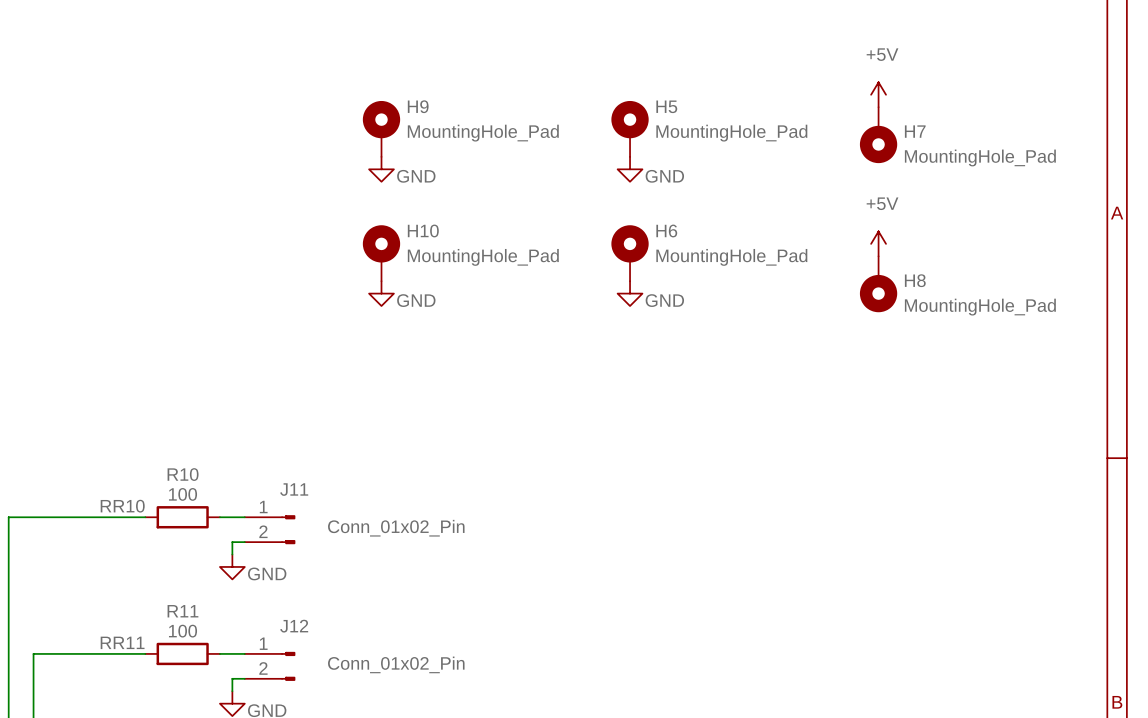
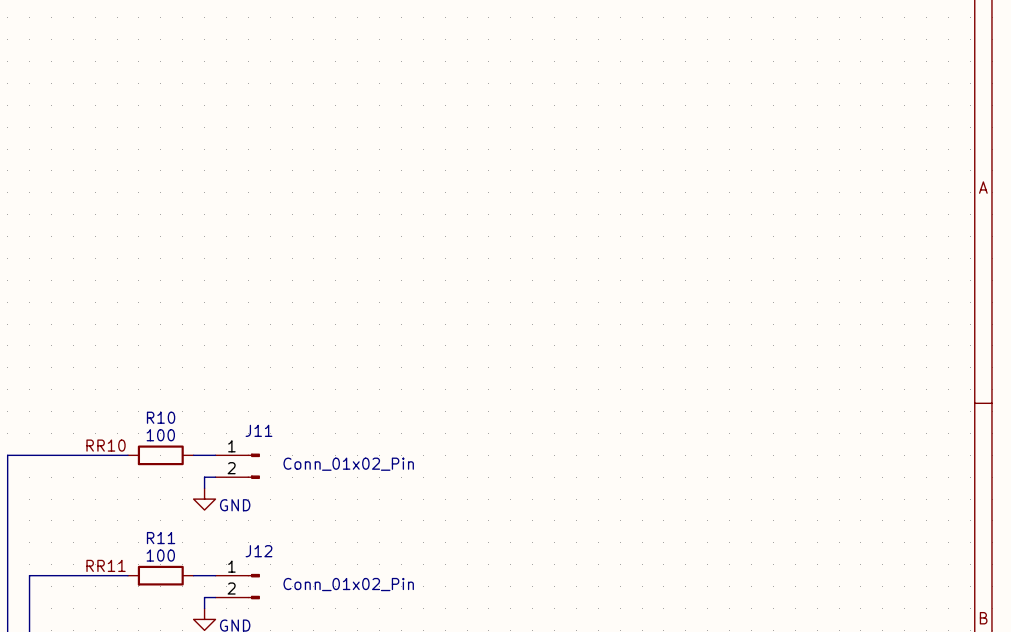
power symbol: +5V (878, 94) -> none
H9: MountingHole_Pad (381, 128) -> none
H5: MountingHole_Pad (630, 128) -> none
H7: MountingHole_Pad (878, 135) -> none
power symbol: GND (381, 169) -> none
power symbol: GND (630, 169) -> none
power symbol: +5V (878, 243) -> none
H10: MountingHole_Pad (381, 253) -> none
H6: MountingHole_Pad (630, 253) -> none
H8: MountingHole_Pad (878, 284) -> none
power symbol: GND (381, 293) -> none
power symbol: GND (630, 293) -> none

